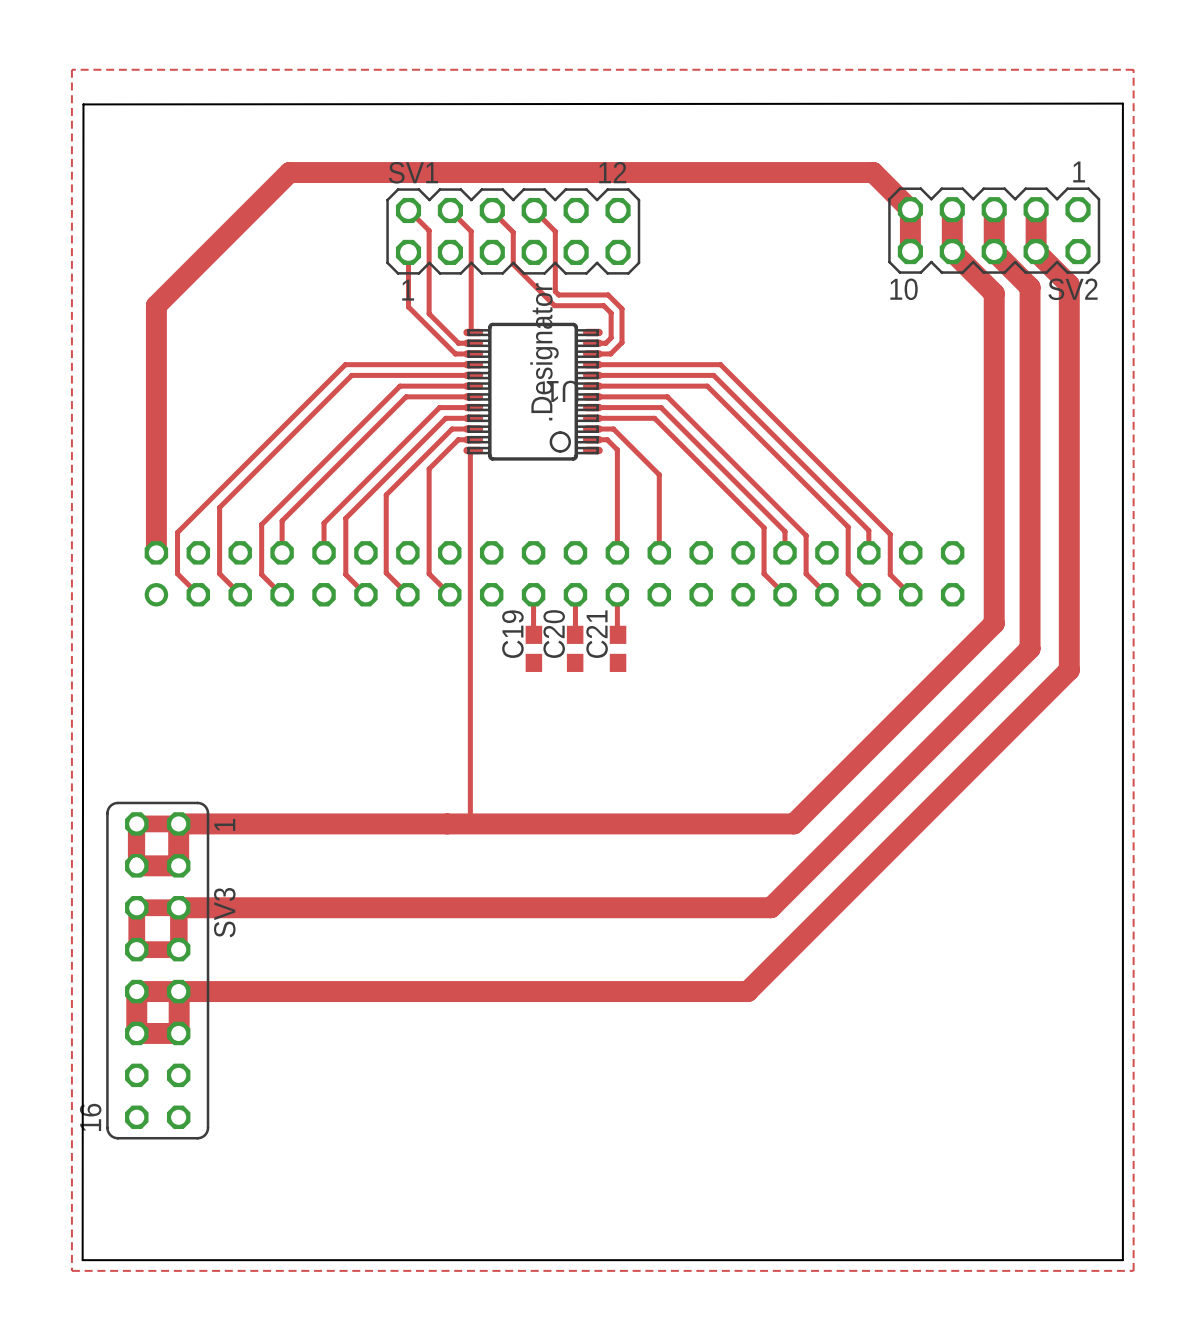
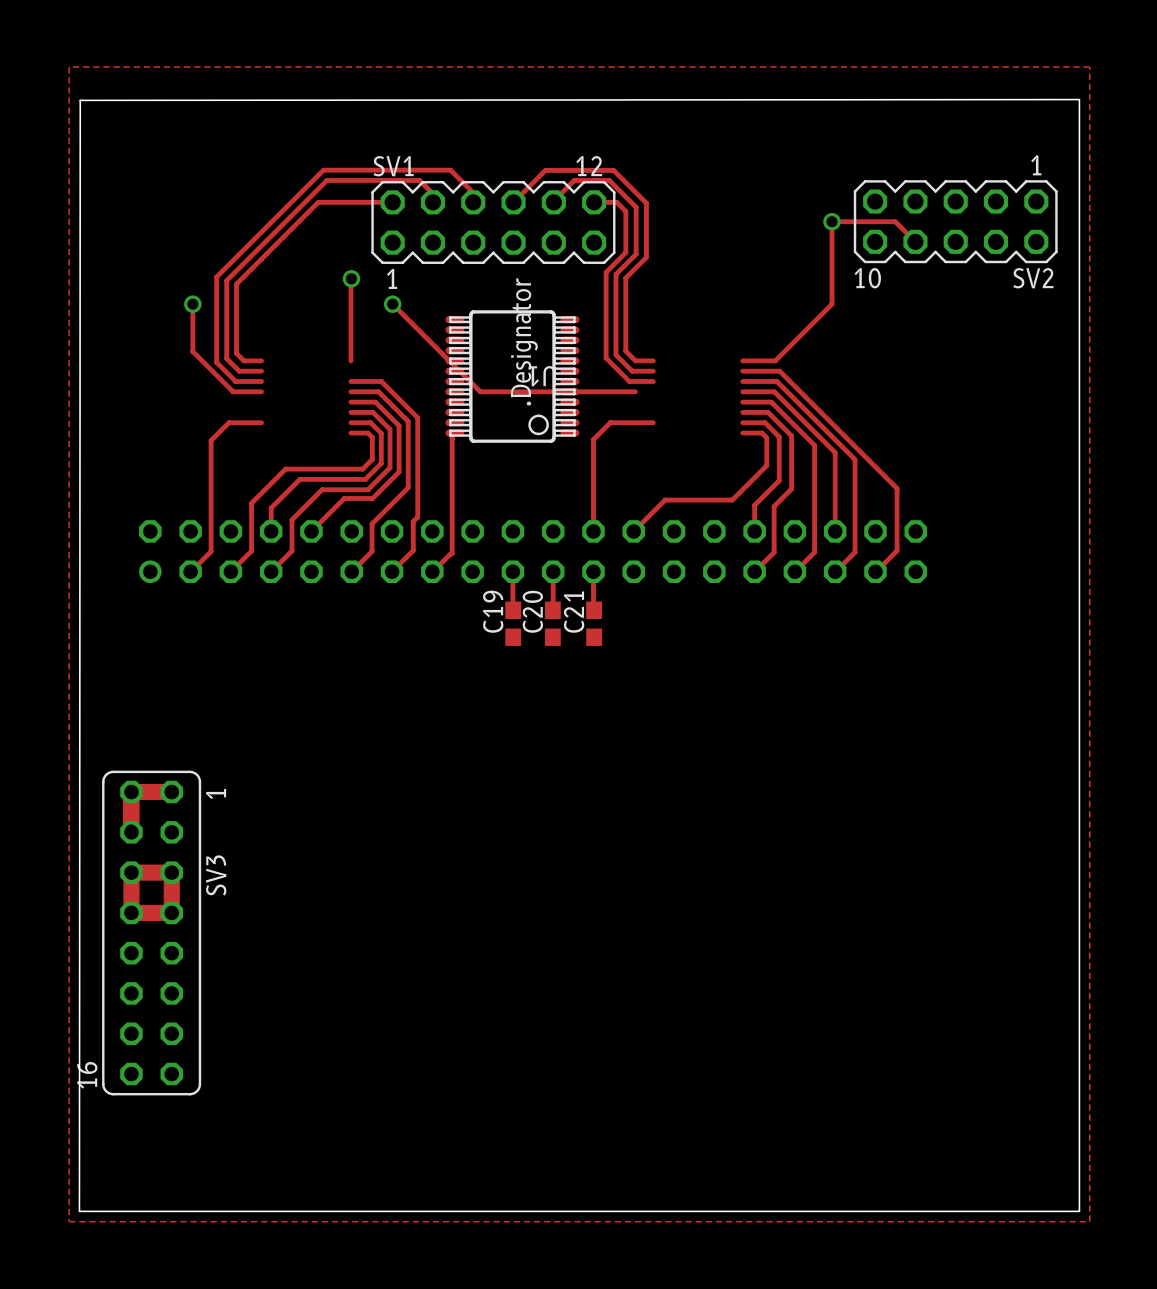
track: (952, 209) (952, 251) (994, 293) (994, 623) (793, 823) (178, 823) (178, 865) (136, 865) -> none
track: (994, 209) (994, 251) (1030, 287) (1030, 648) (770, 907) (179, 907) (179, 949) -> none
track: (1036, 209) (1036, 251) (1069, 284) (1069, 670) (747, 991) (179, 991) (179, 1033) -> none
track: (408, 210) (429, 230) (429, 313) (458, 343) (473, 343) -> (392, 202) (318, 202) (236, 284) (236, 353) (244, 360) (261, 360)
track: (450, 210) (471, 231) (471, 330) (473, 332) -> (432, 202) (432, 193) (419, 180) (326, 180) (226, 280) (226, 358) (239, 371) (261, 371)
track: (492, 210) (513, 232) (513, 264) (554, 305) (603, 305) (611, 313) (611, 337) (605, 343) (592, 343) -> (473, 202) (473, 192) (450, 170) (323, 170) (216, 277) (216, 362) (235, 381) (261, 381)
track: (534, 210) (555, 231) (555, 291) (558, 294) (608, 294) (621, 308) (621, 342) (610, 353) (592, 353) -> (513, 202) (545, 170) (613, 170) (646, 203) (646, 257) (625, 278) (625, 351) (635, 360) (653, 360)
via: none -> (832, 221)
track: (910, 251) (910, 209) (873, 172) (289, 172) (156, 305) (156, 552) -> none
track: none -> (915, 241) (895, 221) (832, 221) (832, 304) (775, 360) (742, 360)
track: (408, 252) (408, 307) (455, 353) (473, 353) -> none
track: none -> (351, 278) (350, 360)
via: none -> (351, 278)
track: none -> (192, 304) (192, 351) (233, 391) (261, 391)
via: none -> (192, 304)
track: none -> (392, 304) (480, 391) (569, 391)
via: none -> (392, 304)
track: (473, 364) (345, 364) (177, 532) (177, 573) (198, 594) -> none
track: (592, 364) (720, 364) (890, 534) (890, 574) (910, 594) -> (742, 371) (779, 371) (897, 488) (897, 550) (875, 571)
track: (473, 375) (351, 375) (219, 507) -> (261, 422) (228, 422) (211, 440) (211, 487)
track: (592, 375) (713, 375) (868, 530) -> (742, 391) (774, 391) (835, 452) (835, 510)
track: (473, 386) (400, 386) (261, 524) -> (350, 433) (367, 433) (372, 437) (372, 459) (362, 469) (285, 469) (251, 504)
track: (592, 386) (657, 386) -> (553, 202) (574, 180) (609, 180) (636, 207) (636, 254) (615, 274) (615, 354) (632, 371)
track: (679, 386) (707, 386) (848, 527) (848, 573) (868, 594) -> (742, 381) (776, 381) (855, 459) (855, 552) (835, 571)
track: (473, 396) (406, 396) (282, 520) (282, 528) -> (350, 422) (370, 422) (381, 433) (381, 463) (365, 479) (299, 479) (271, 508)
track: (592, 396) (654, 396) -> (594, 202) (616, 202) (625, 211) (625, 252) (606, 272) (606, 358) (629, 381)
track: (667, 396) (806, 535) (806, 573) (826, 594) -> (742, 402) (771, 402) (814, 445) (814, 552) (795, 571)
track: none -> (641, 381) (653, 381)
track: (473, 407) (439, 407) (324, 523) (324, 552) -> (350, 402) (375, 402) (399, 425) (399, 472) (372, 498) (344, 498) (311, 531)
track: (661, 407) (785, 531) -> (742, 422) (765, 422) (779, 436) (779, 480) (754, 505) (754, 510)
track: (473, 418) (445, 418) (345, 518) (345, 574) (365, 594) -> (350, 391) (378, 391) (408, 421) (408, 487) (372, 523) (372, 551) (351, 571)
track: (592, 418) (654, 418) (764, 527) (764, 573) (785, 594) -> (742, 412) (768, 412) (791, 435) (791, 488) (774, 506) (774, 552) (754, 571)
track: none -> (350, 412) (372, 412) (390, 429) (390, 467) (367, 489) (322, 489) (291, 519) (291, 550) (271, 571)
track: (473, 429) (452, 429) (386, 494) (386, 572) (407, 594) -> (350, 381) (381, 381) (417, 417) (417, 517) (413, 521) (413, 550) (392, 571)
track: (592, 429) (613, 429) (659, 474) (659, 552) -> (742, 433) (761, 433) (766, 437) (766, 465) (732, 500) (665, 500) (633, 531)
track: (473, 439) (458, 439) (429, 468) (429, 573) (449, 594) -> (452, 553) (432, 571)
track: (592, 439) (607, 439) (617, 449) (617, 457) -> (653, 422) (610, 422) (593, 439)
track: (219, 573) (240, 594) -> (211, 551) (190, 571)
track: (261, 573) (281, 594) -> (251, 551) (230, 571)
track: (470, 575) (470, 822) (448, 822) (447, 823) -> none
track: (178, 991) (136, 991) (136, 1033) (178, 1033) -> none

